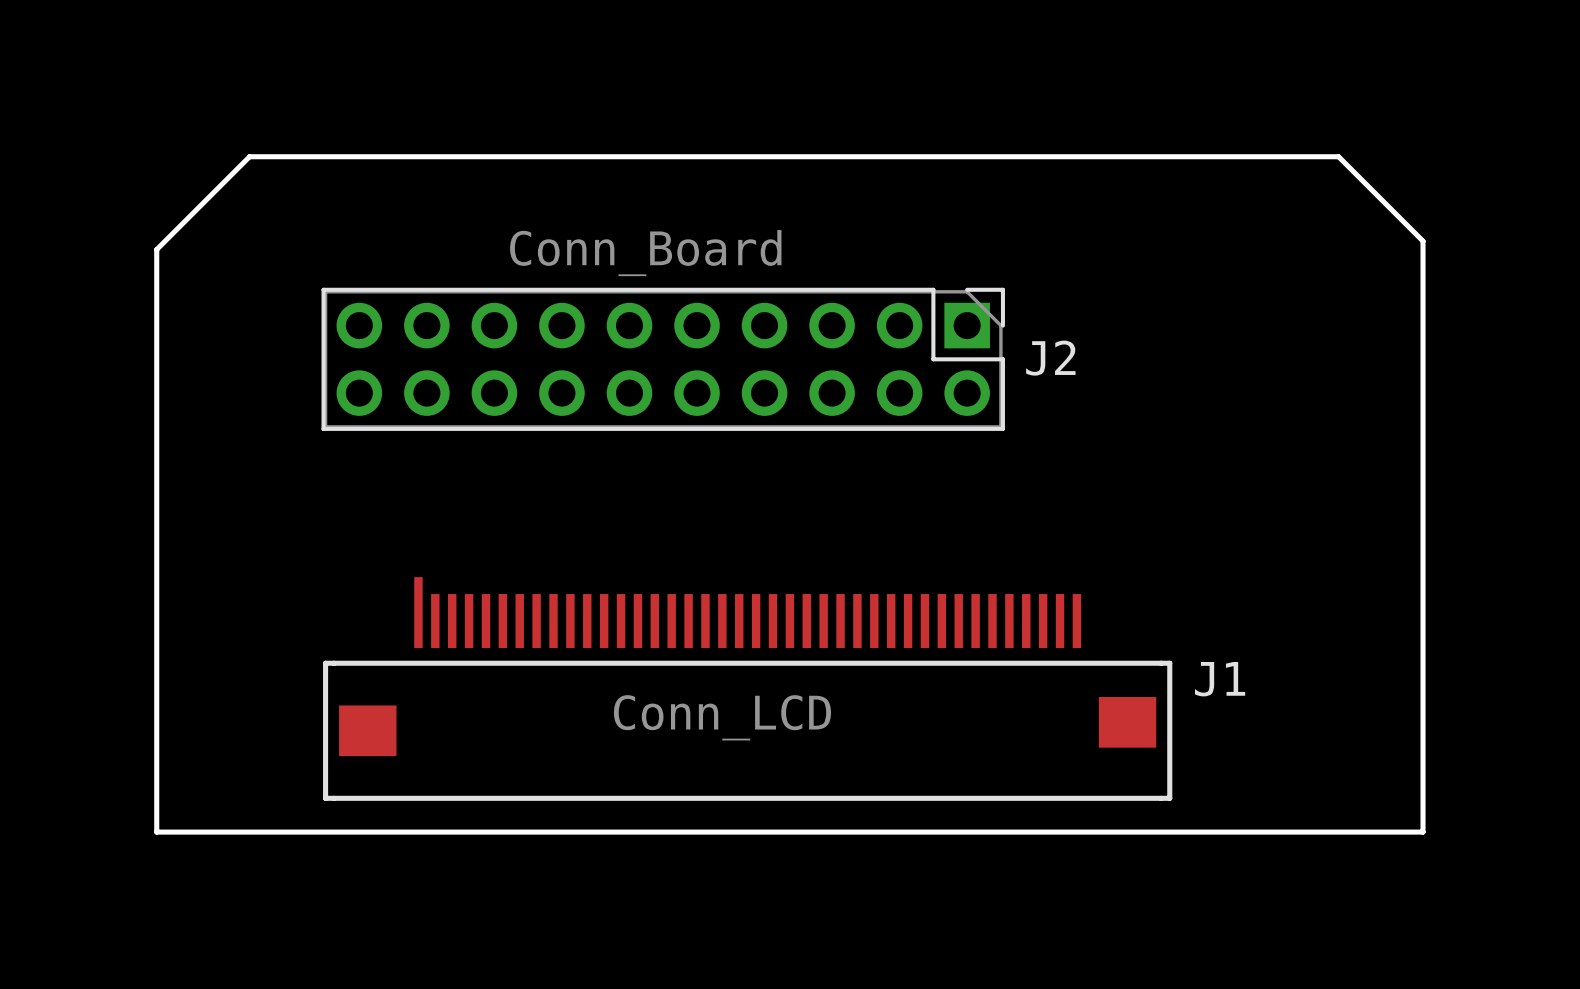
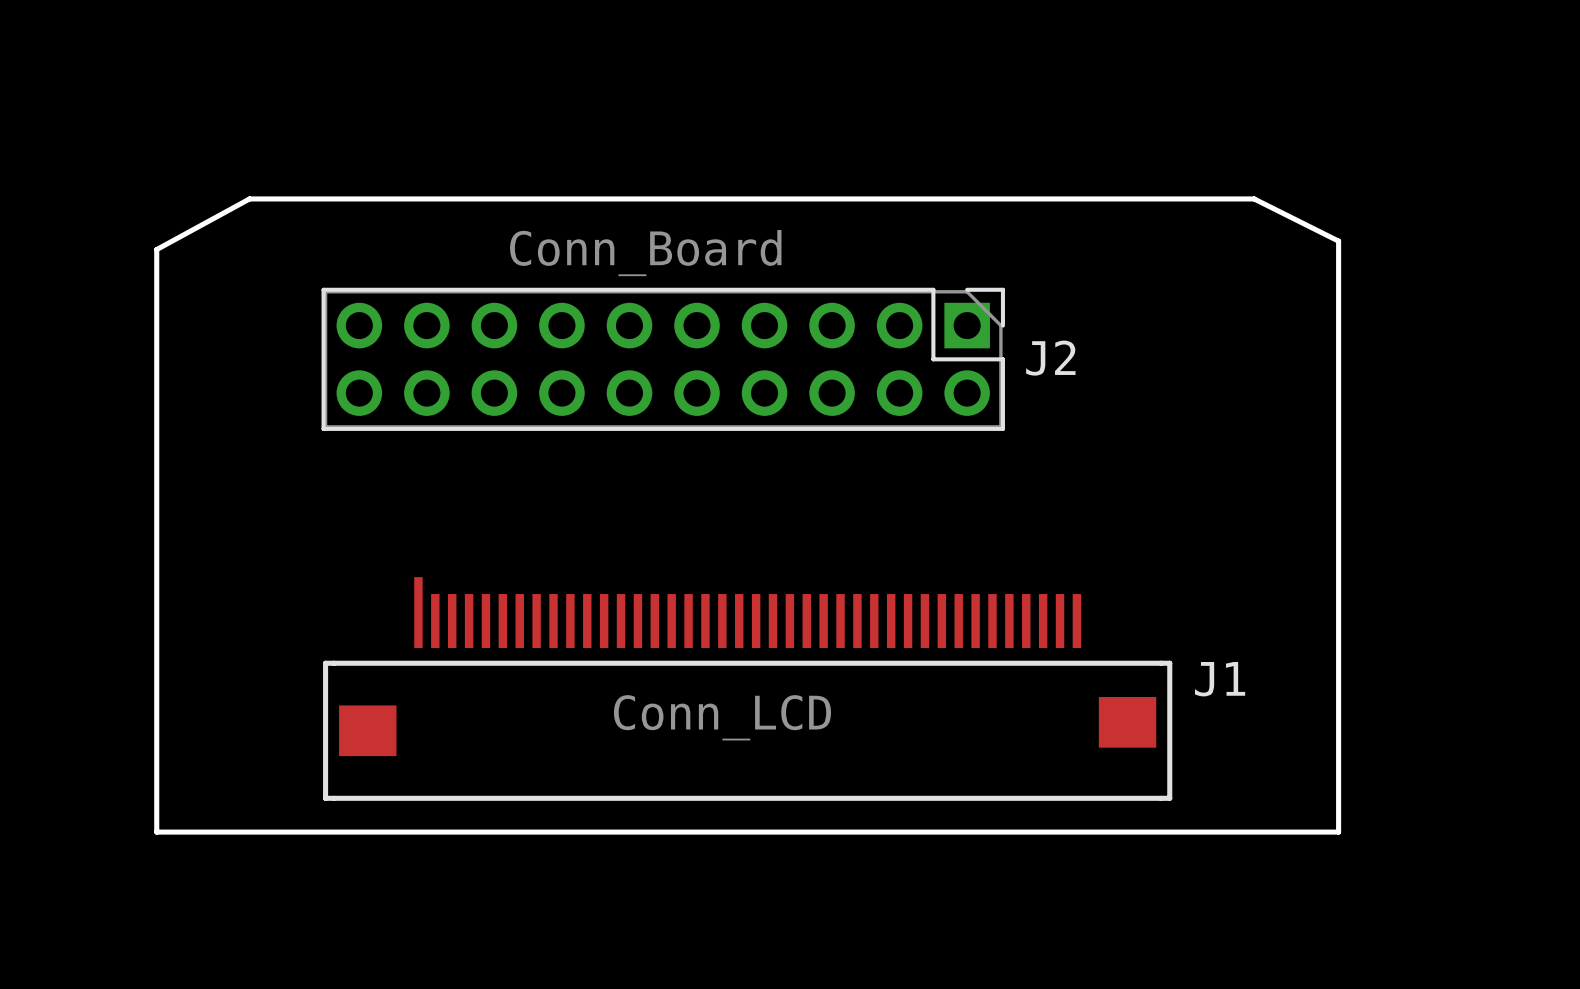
board edge: (156, 249) (249, 156) (1338, 156) (1423, 241) (1423, 832) (1338, 832) -> (156, 249) (249, 198) (1254, 198) (1338, 241) (1338, 832)

